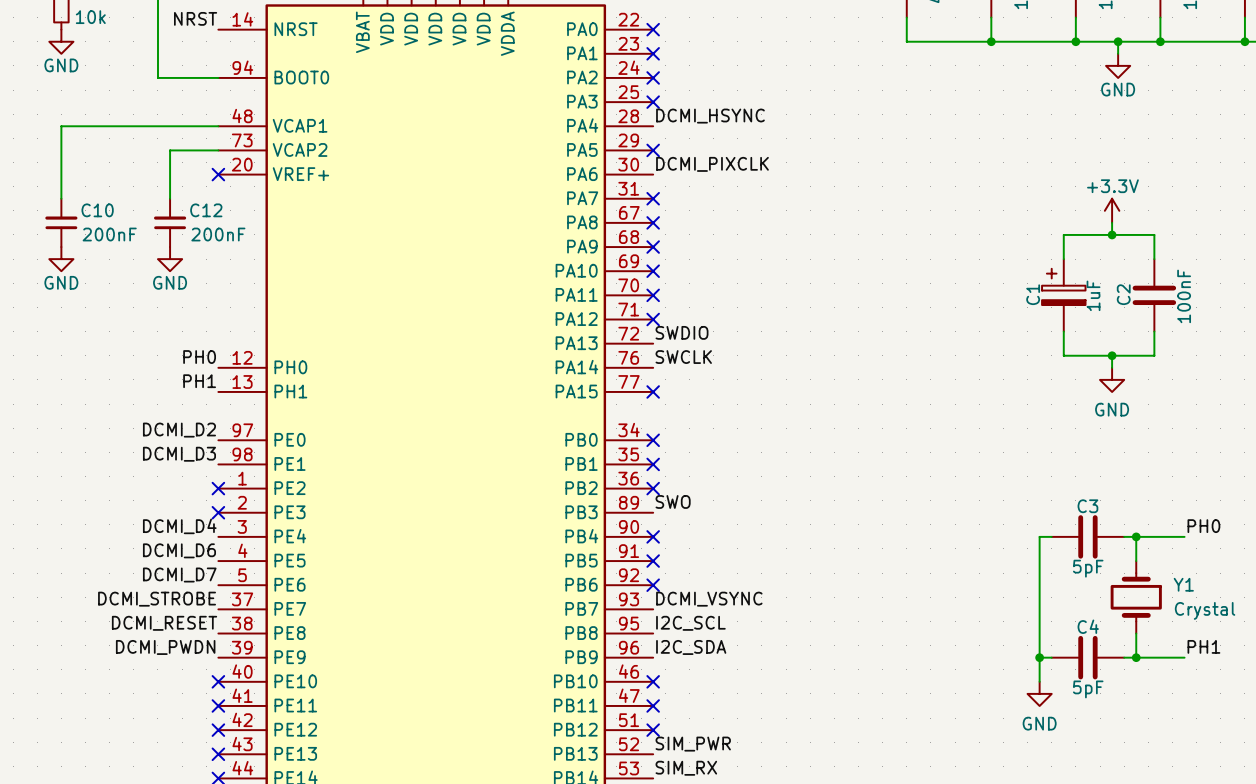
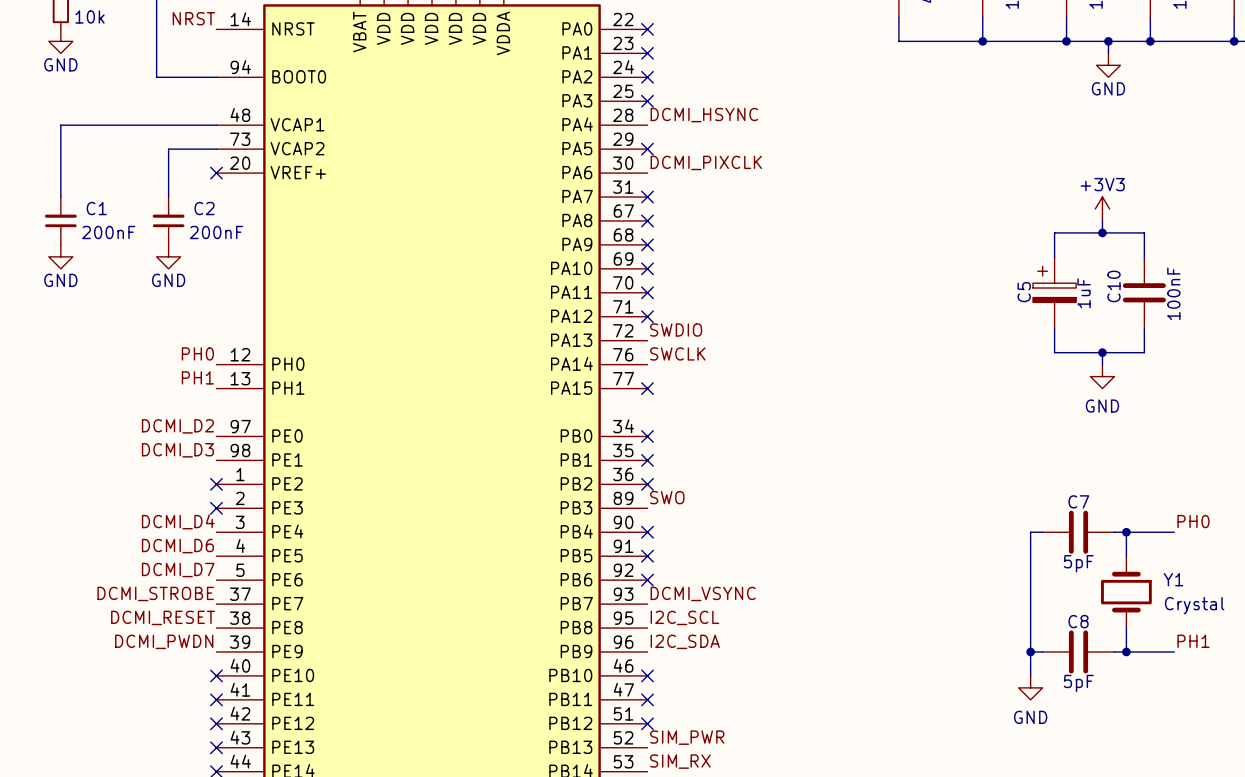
C10 name: C10 (97, 210) -> C1 (96, 208)
C12 name: C12 (206, 210) -> C2 (204, 208)
power symbol: +3.3V (1112, 210) -> +3V3 (1102, 208)
C1 name: C1 (1033, 294) -> C5 (1024, 292)
C2 name: C2 (1123, 294) -> C10 (1113, 286)
C3 name: C3 (1087, 506) -> C7 (1078, 501)
C4 name: C4 (1088, 626) -> C8 (1078, 621)

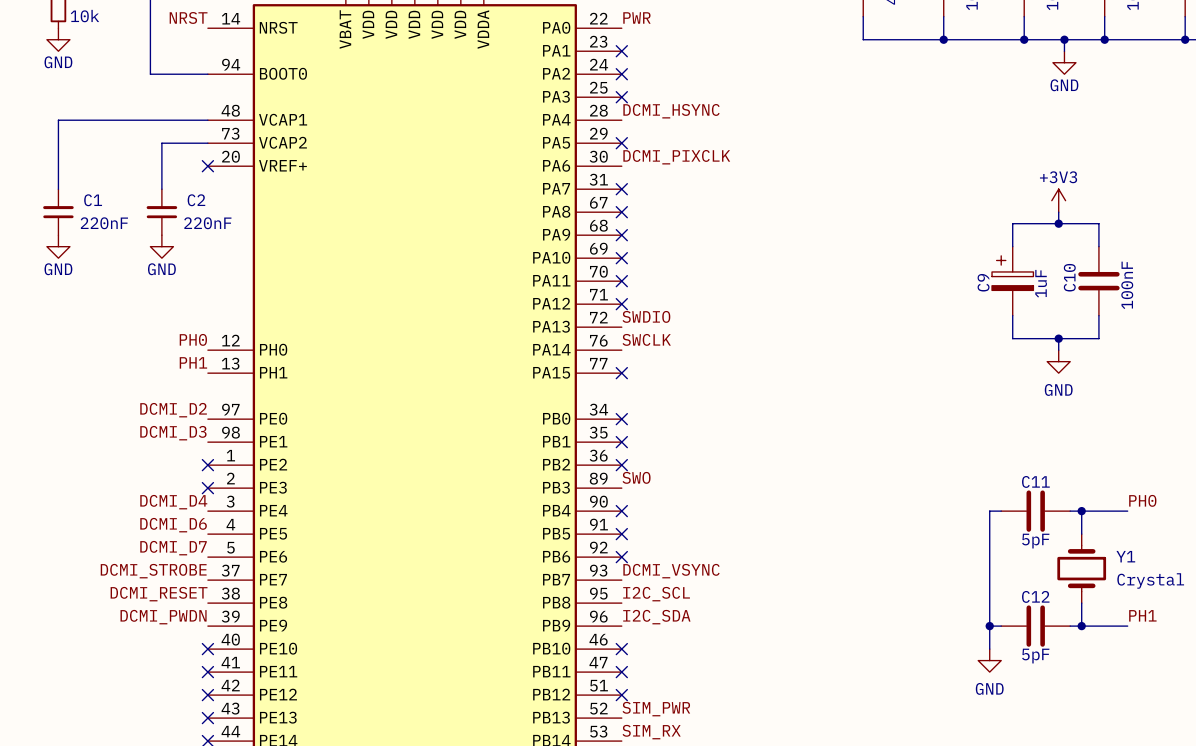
label: none -> PWR (636, 17)
no-connect mark: (647, 29) -> none
C1 value: 200nF (108, 232) -> 220nF (104, 223)
C2 value: 200nF (216, 232) -> 220nF (207, 223)
C5 name: C5 (1024, 292) -> C9 (983, 282)
C7 name: C7 (1078, 501) -> C11 (1035, 481)
C8 name: C8 (1078, 621) -> C12 (1035, 596)

